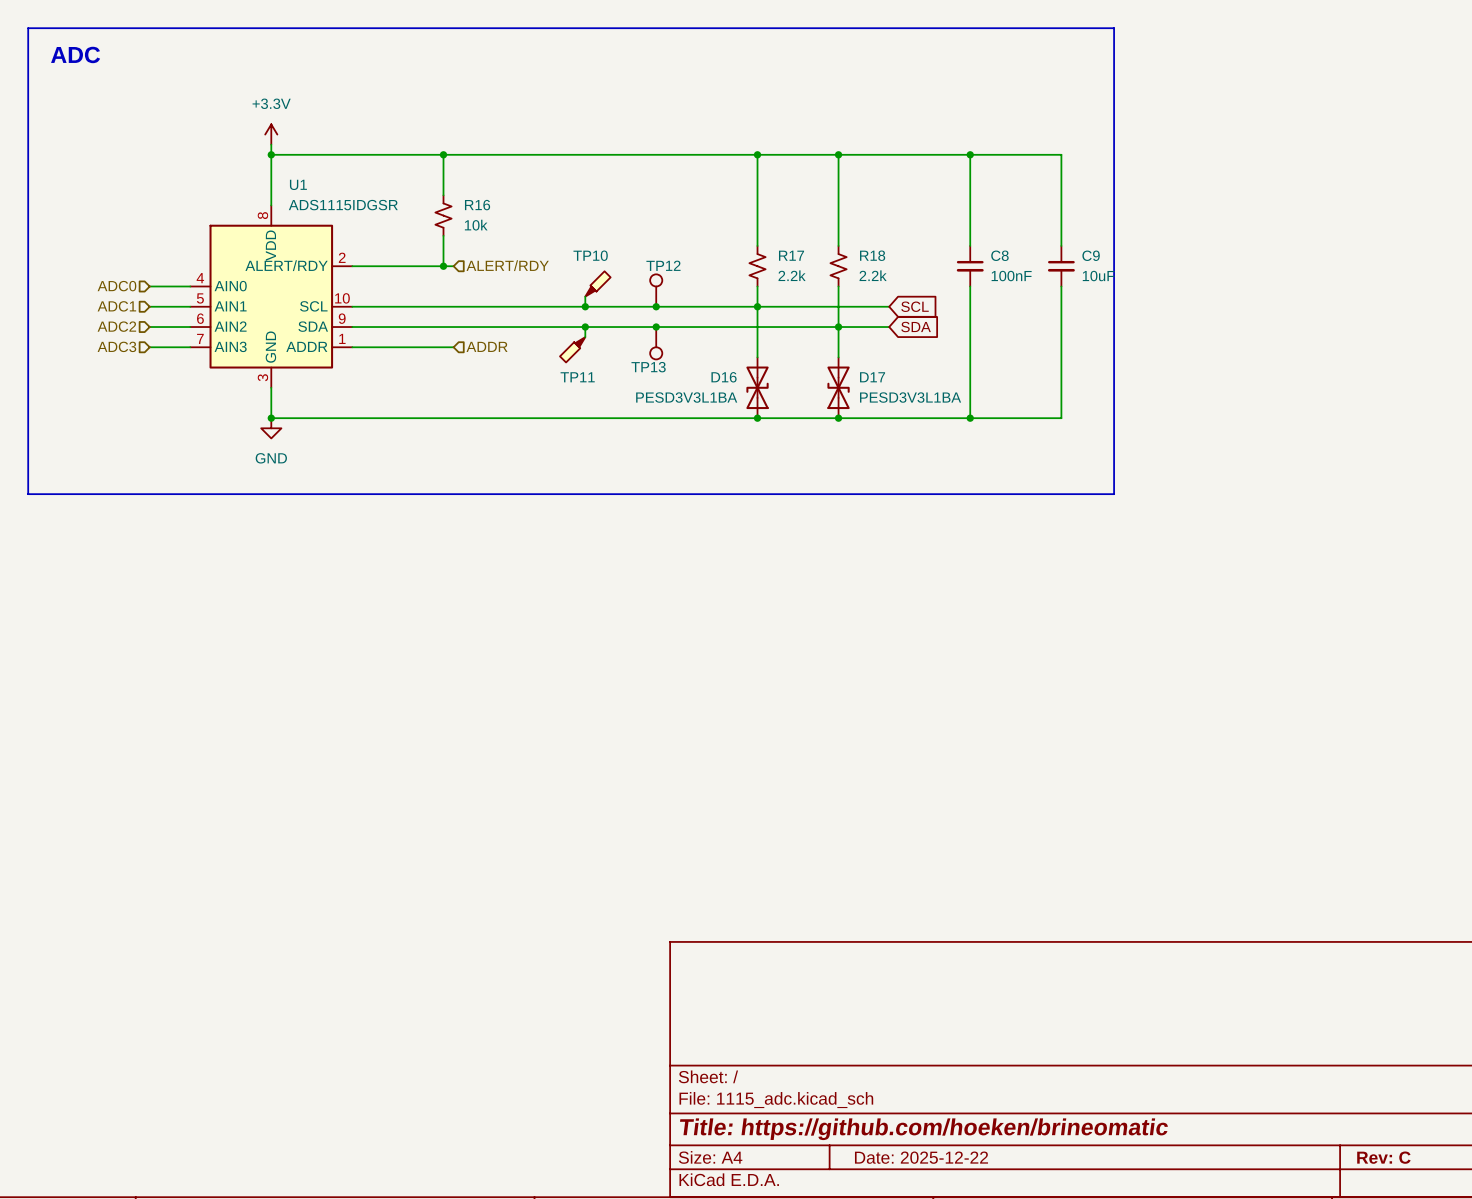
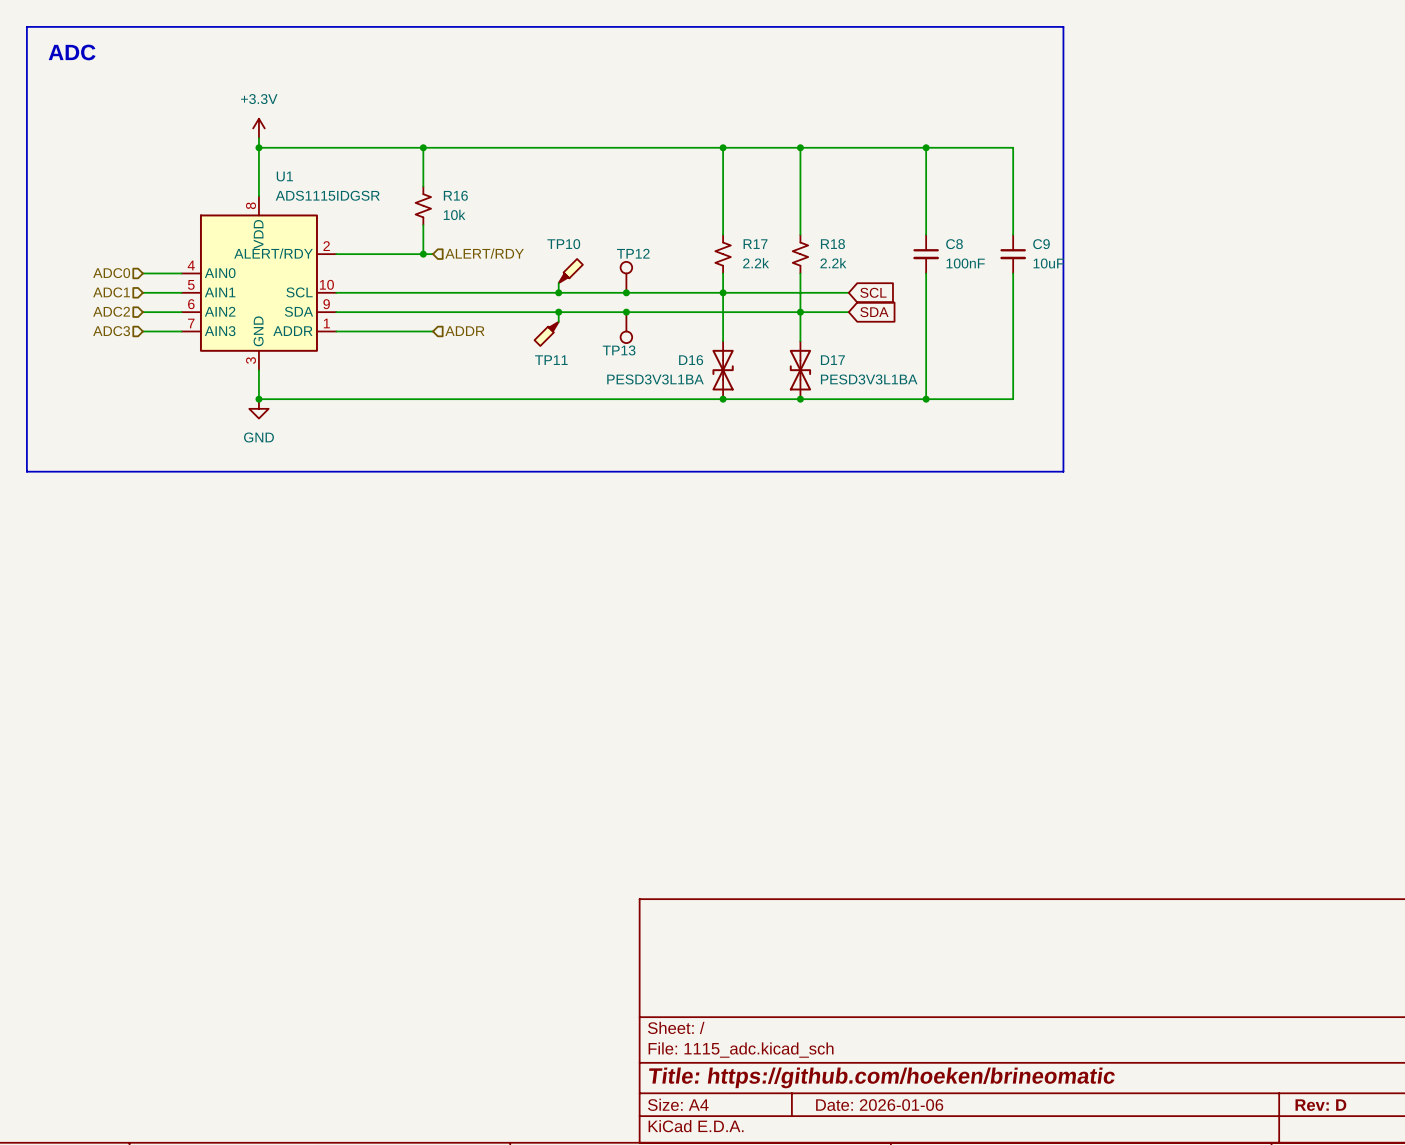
title block: Date: 2025-12-22 (921, 1157) -> Date: 2026-01-06 (879, 1105)
title block: Rev: C (1383, 1157) -> Rev: D (1320, 1105)

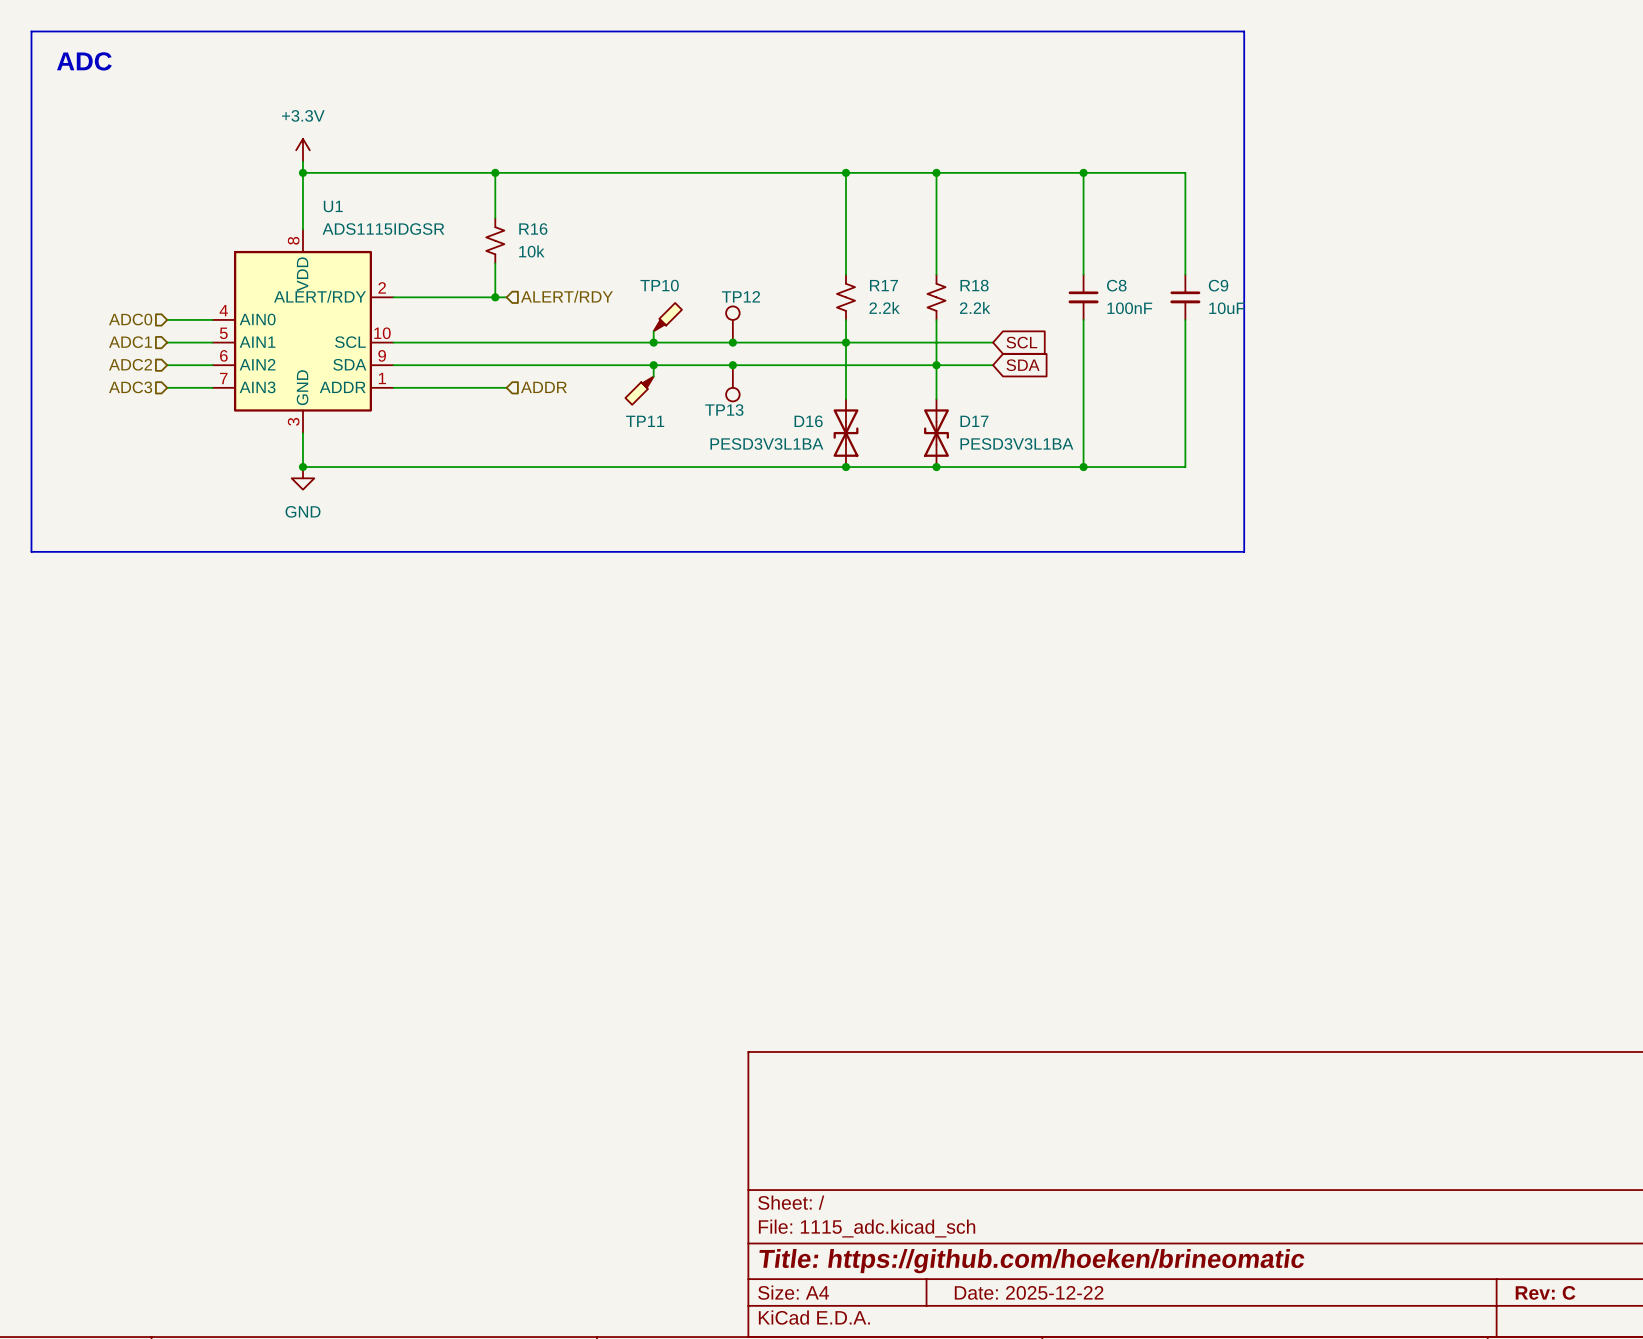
title block: Date: 2026-01-06 (879, 1105) -> Date: 2025-12-22 (1029, 1292)
title block: Rev: D (1320, 1105) -> Rev: C (1545, 1292)

